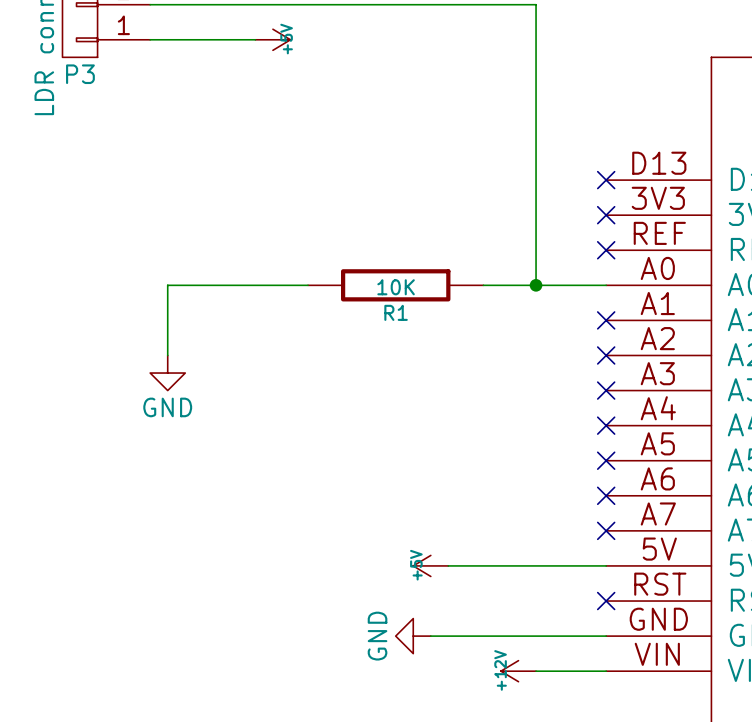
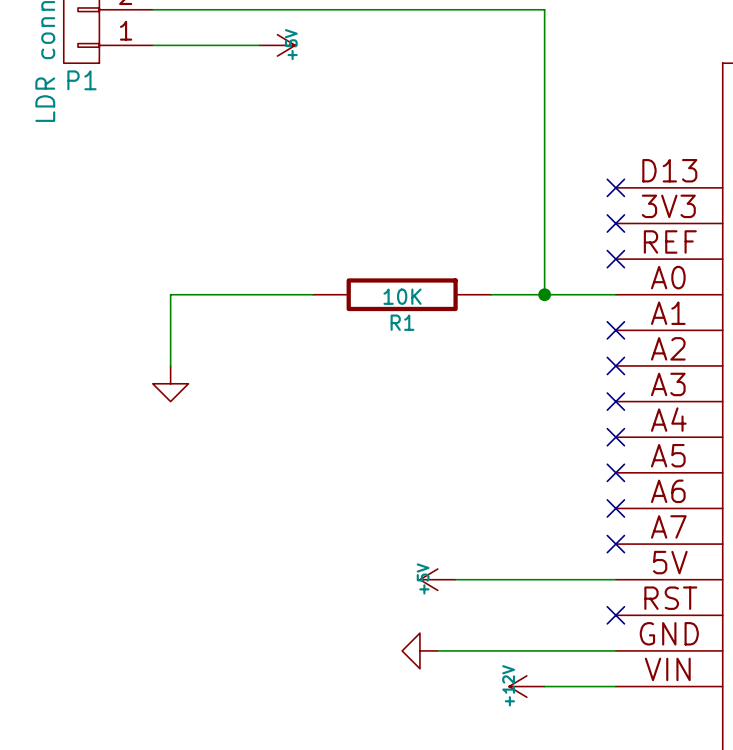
P3 name: P3 (80, 74) -> P1 (81, 80)
power symbol text: GND (167, 407) -> none
power symbol text: GND (377, 636) -> none

